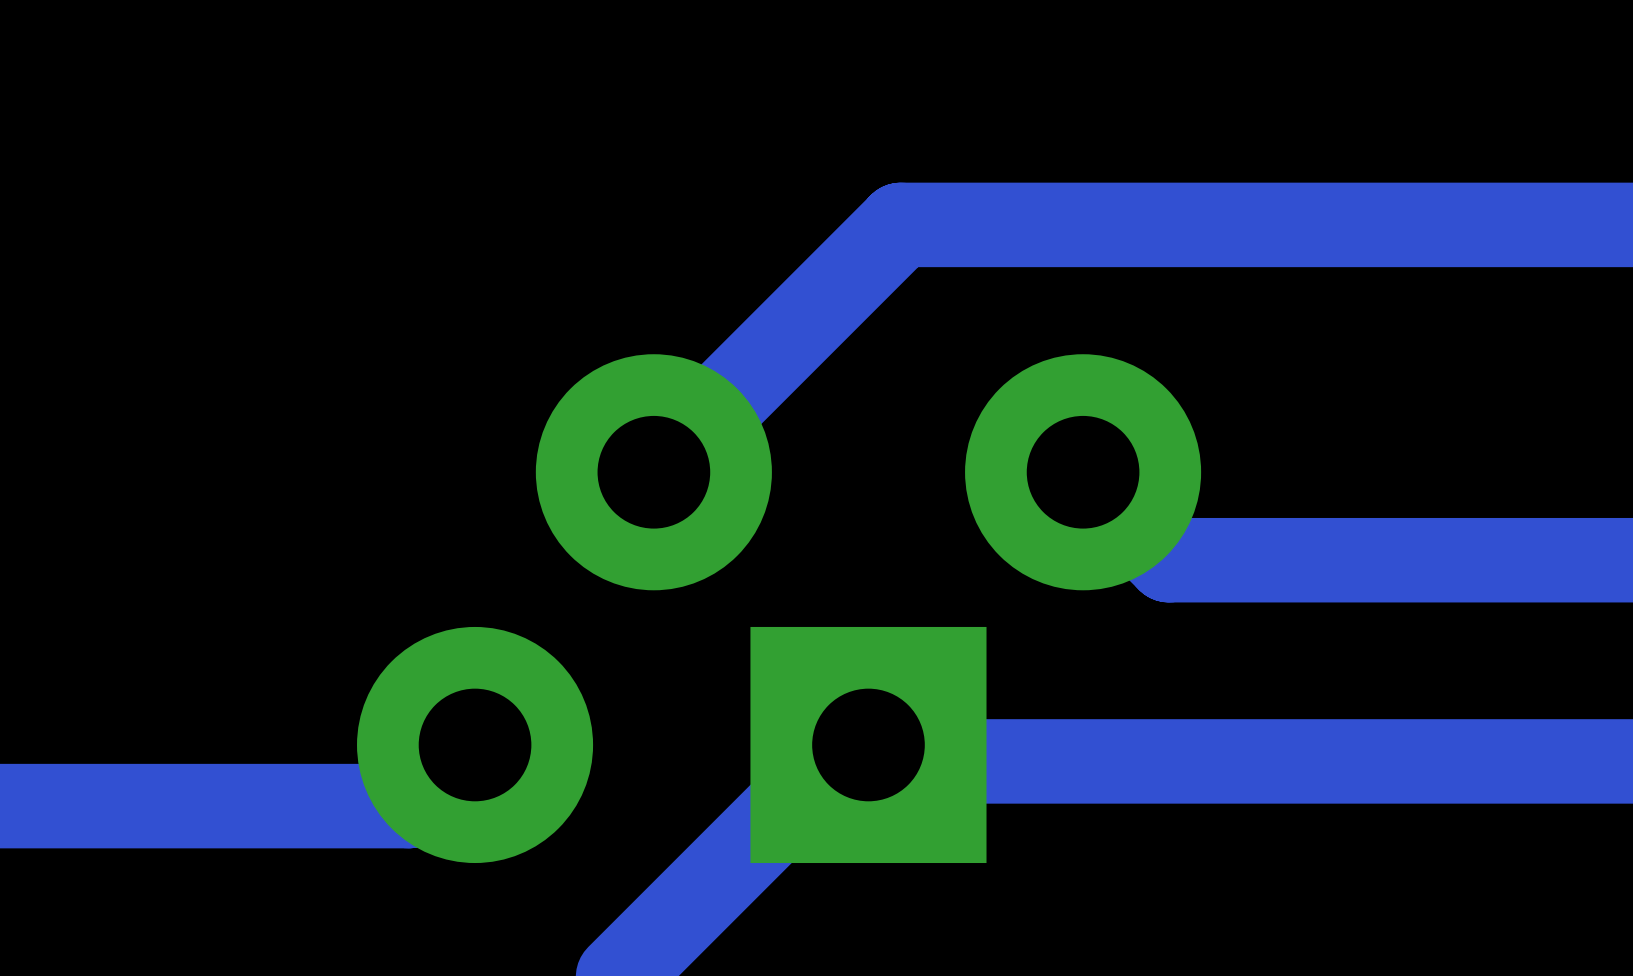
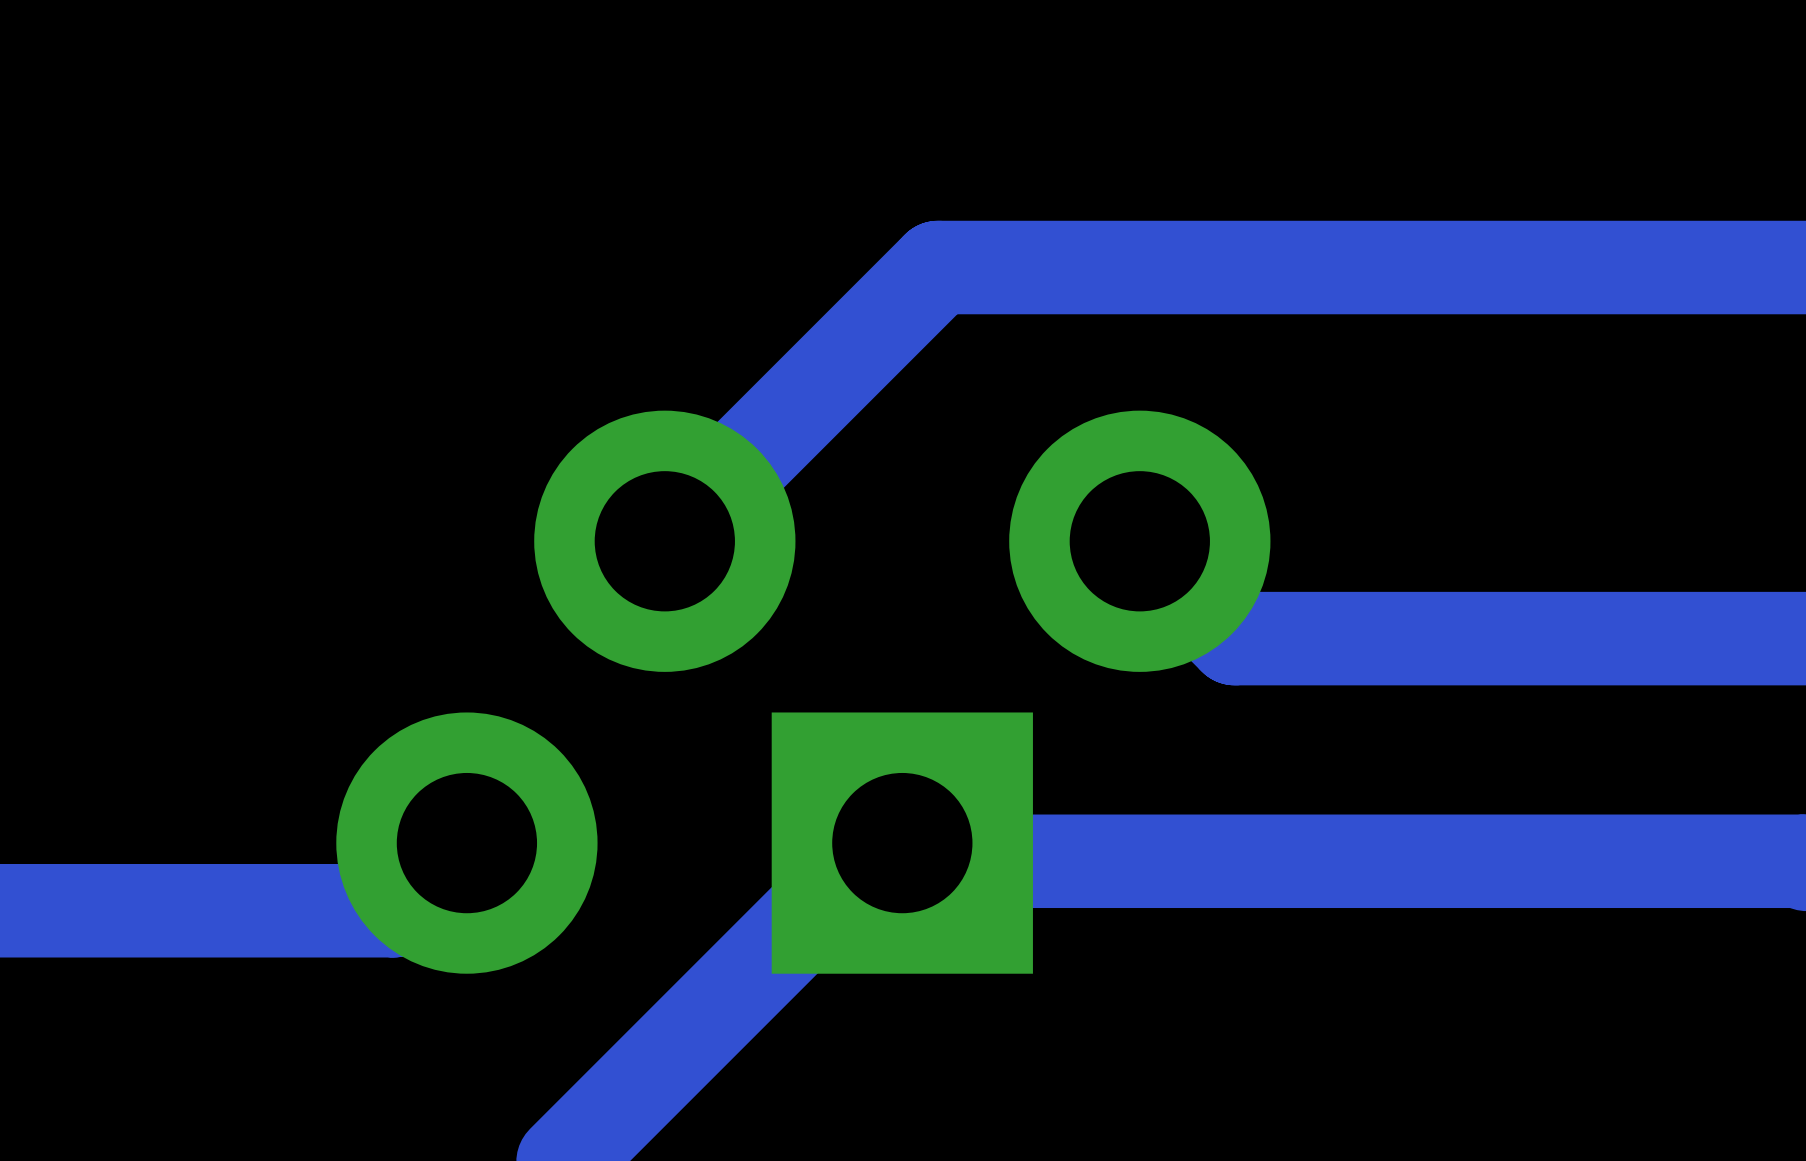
part footprint: [357, 354, 1202, 864] -> [336, 410, 1271, 974]

